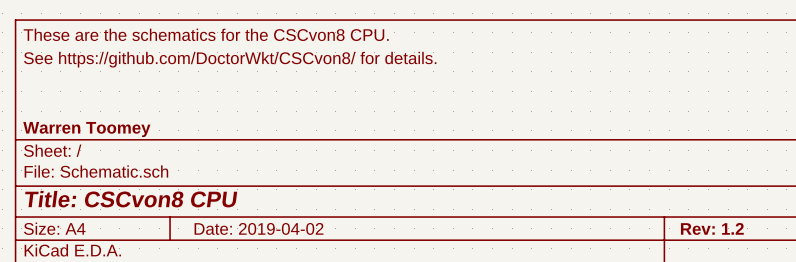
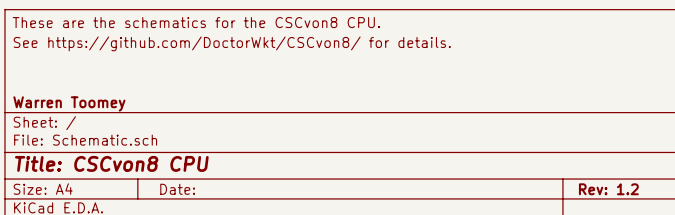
title block: Date: 2019-04-02 (259, 228) -> Date: (177, 189)

